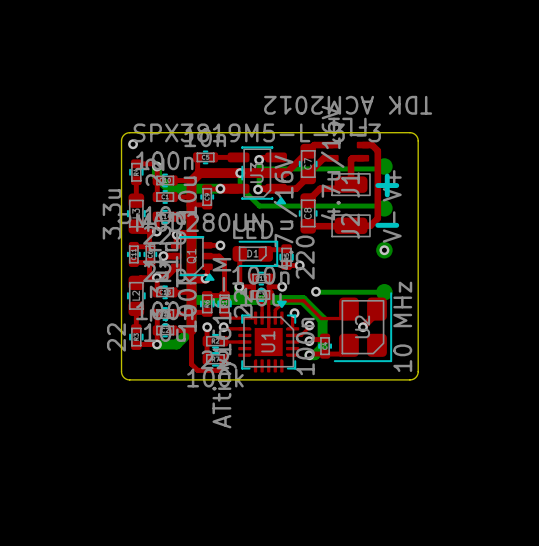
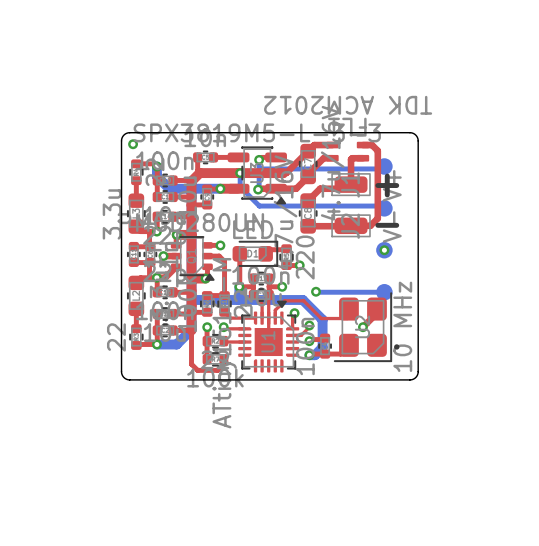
drawing: none -> [394, 344, 400, 350]

